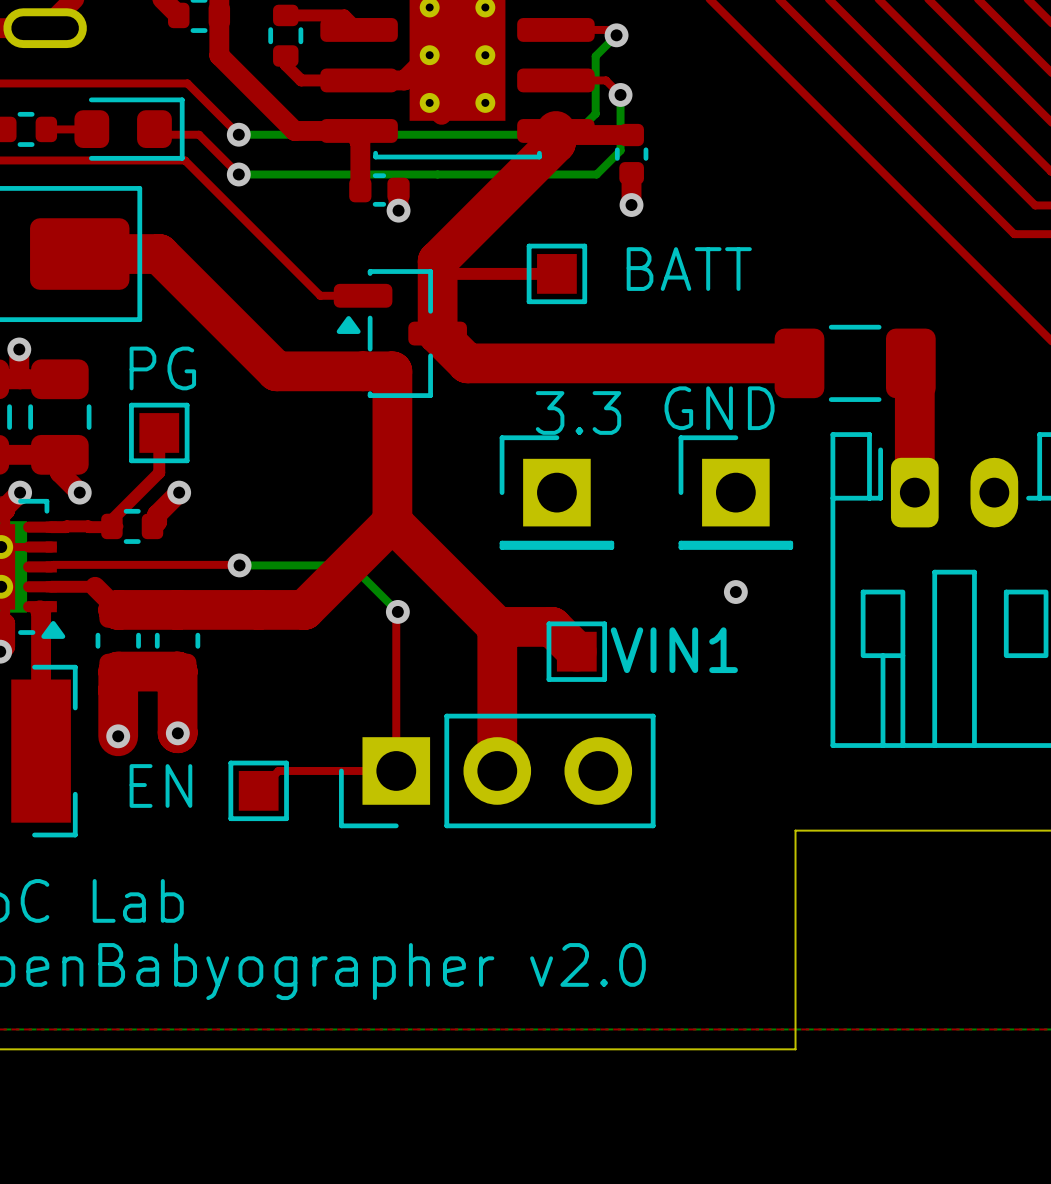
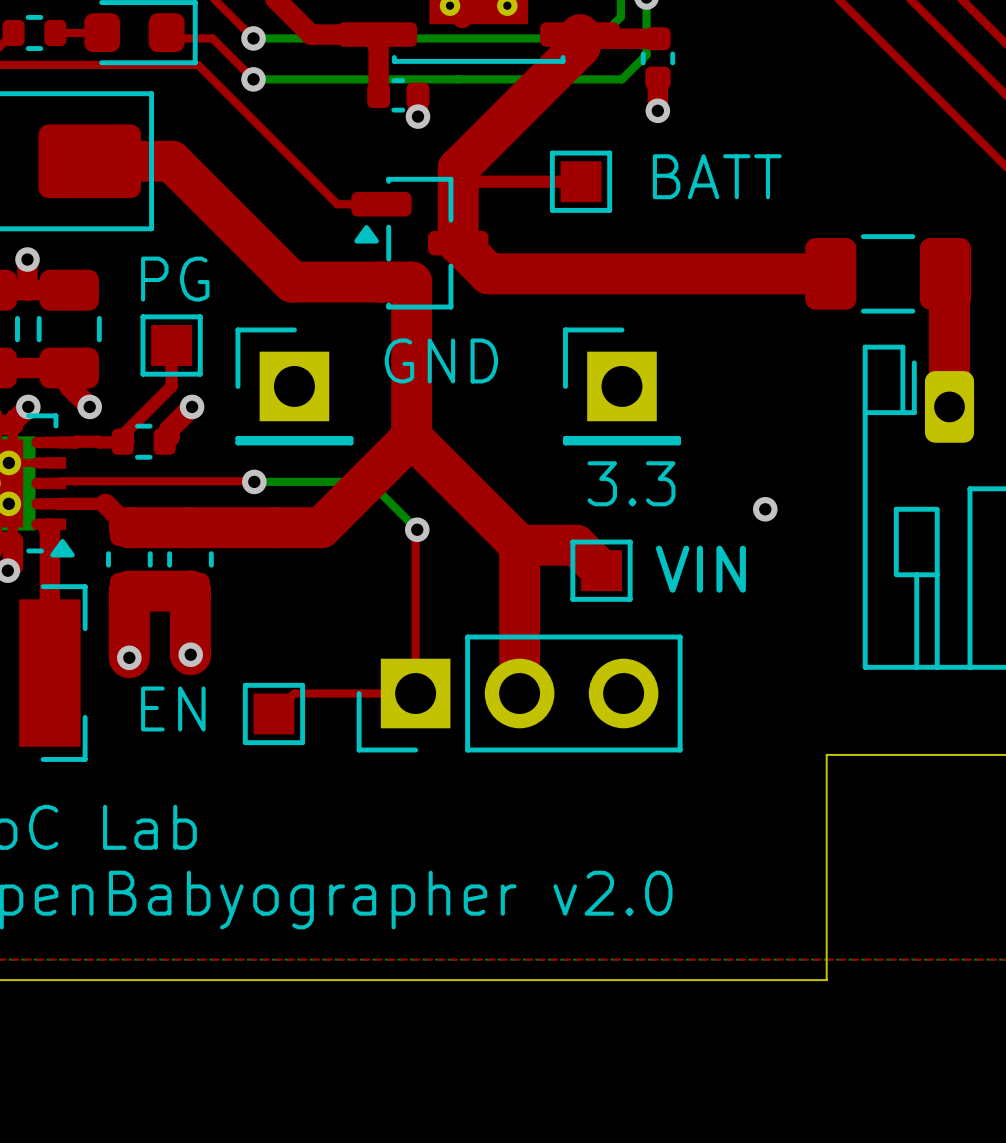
text position: GND (719, 408) -> GND (441, 360)
text position: 3.3 (578, 412) -> 3.3 (631, 483)
part: none -> (294, 386)
part position: (556, 492) -> (621, 386)
part: (735, 492) -> none
VIN1 name: VIN1 (674, 650) -> VIN (700, 569)

